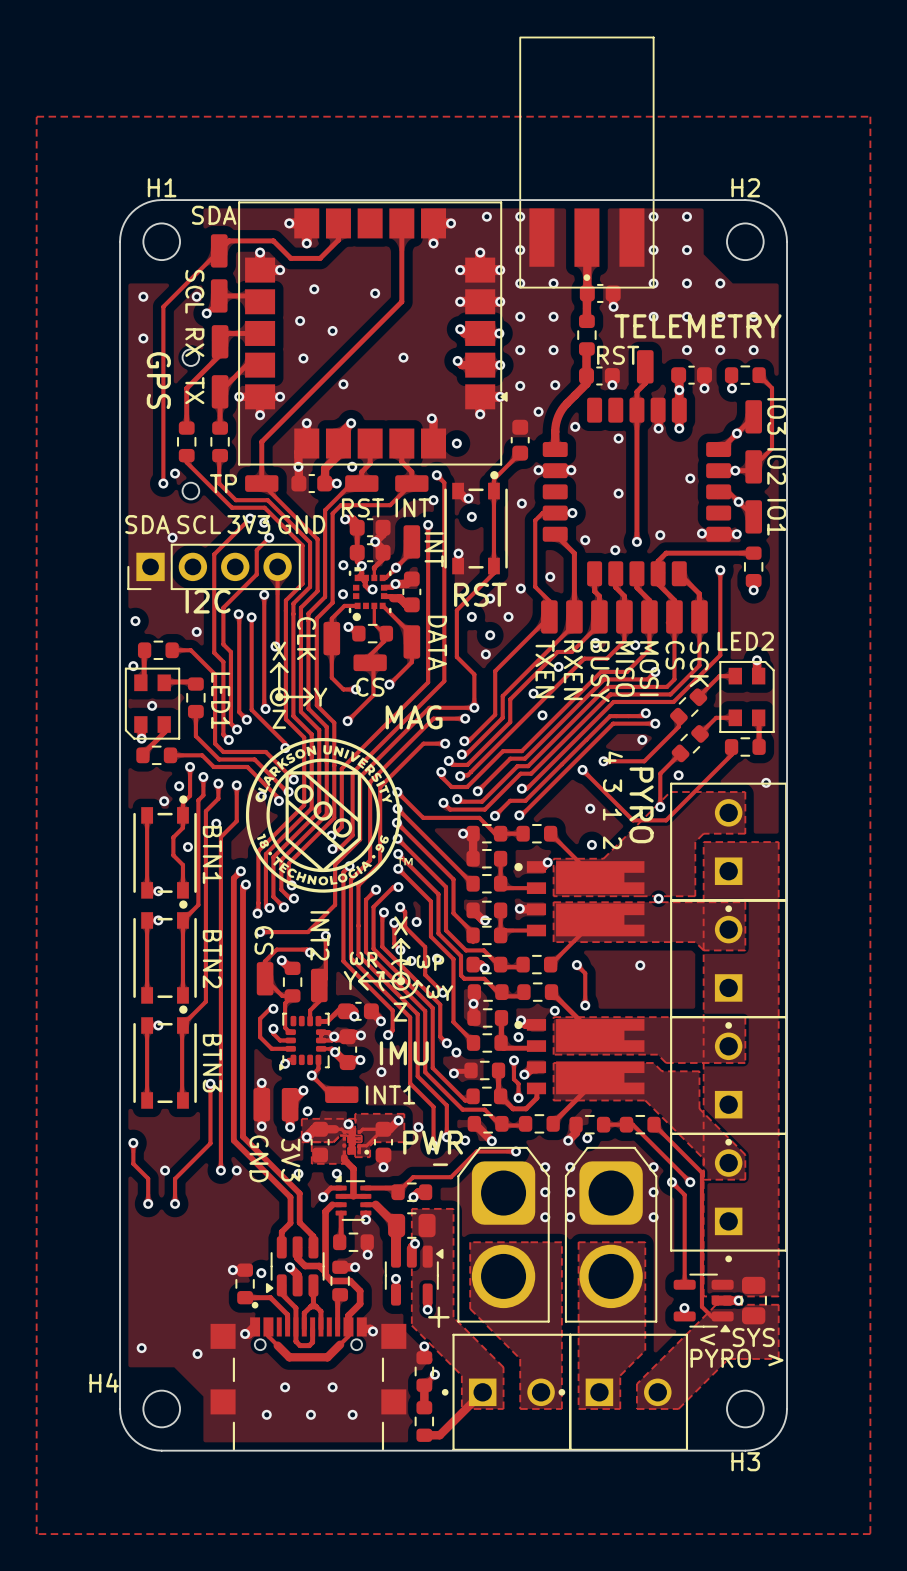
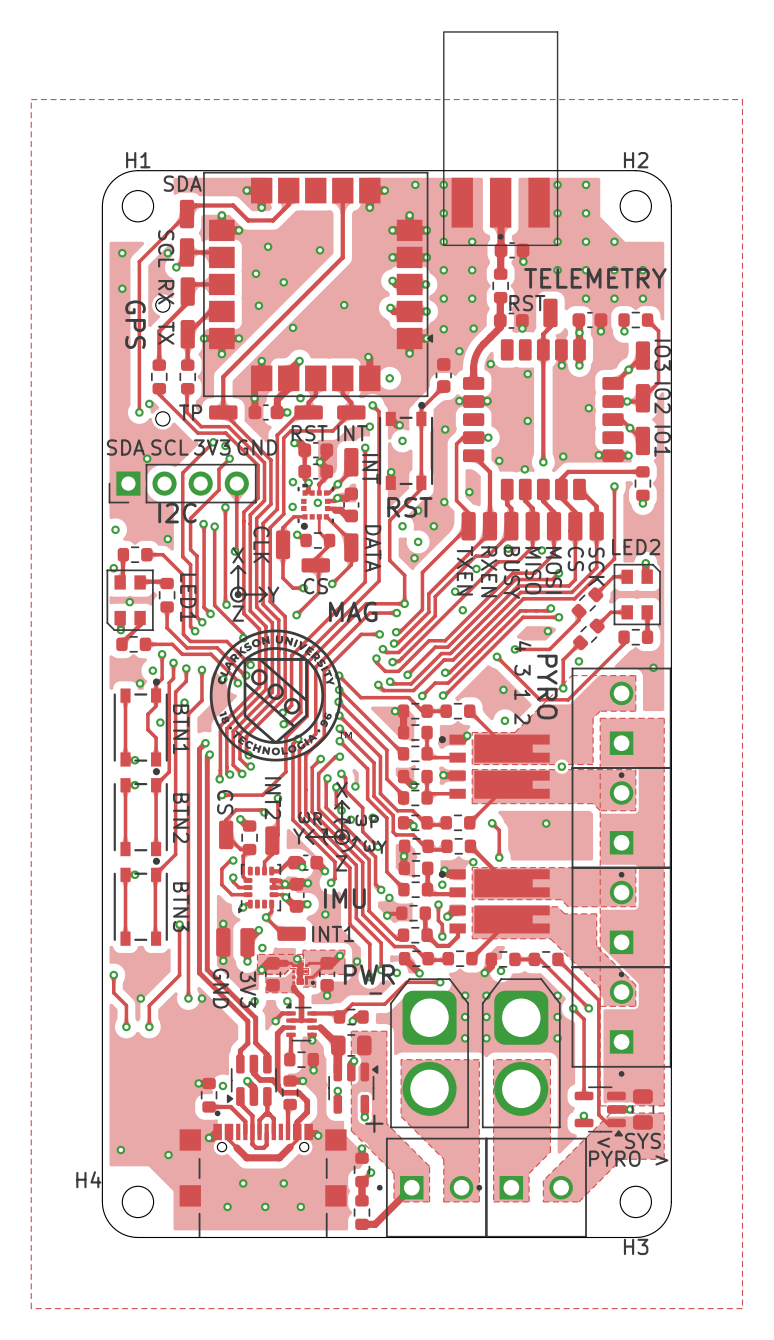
track: (357, 577) (361, 577) (365, 581) (365, 585) (369, 589) (372, 589) -> none

